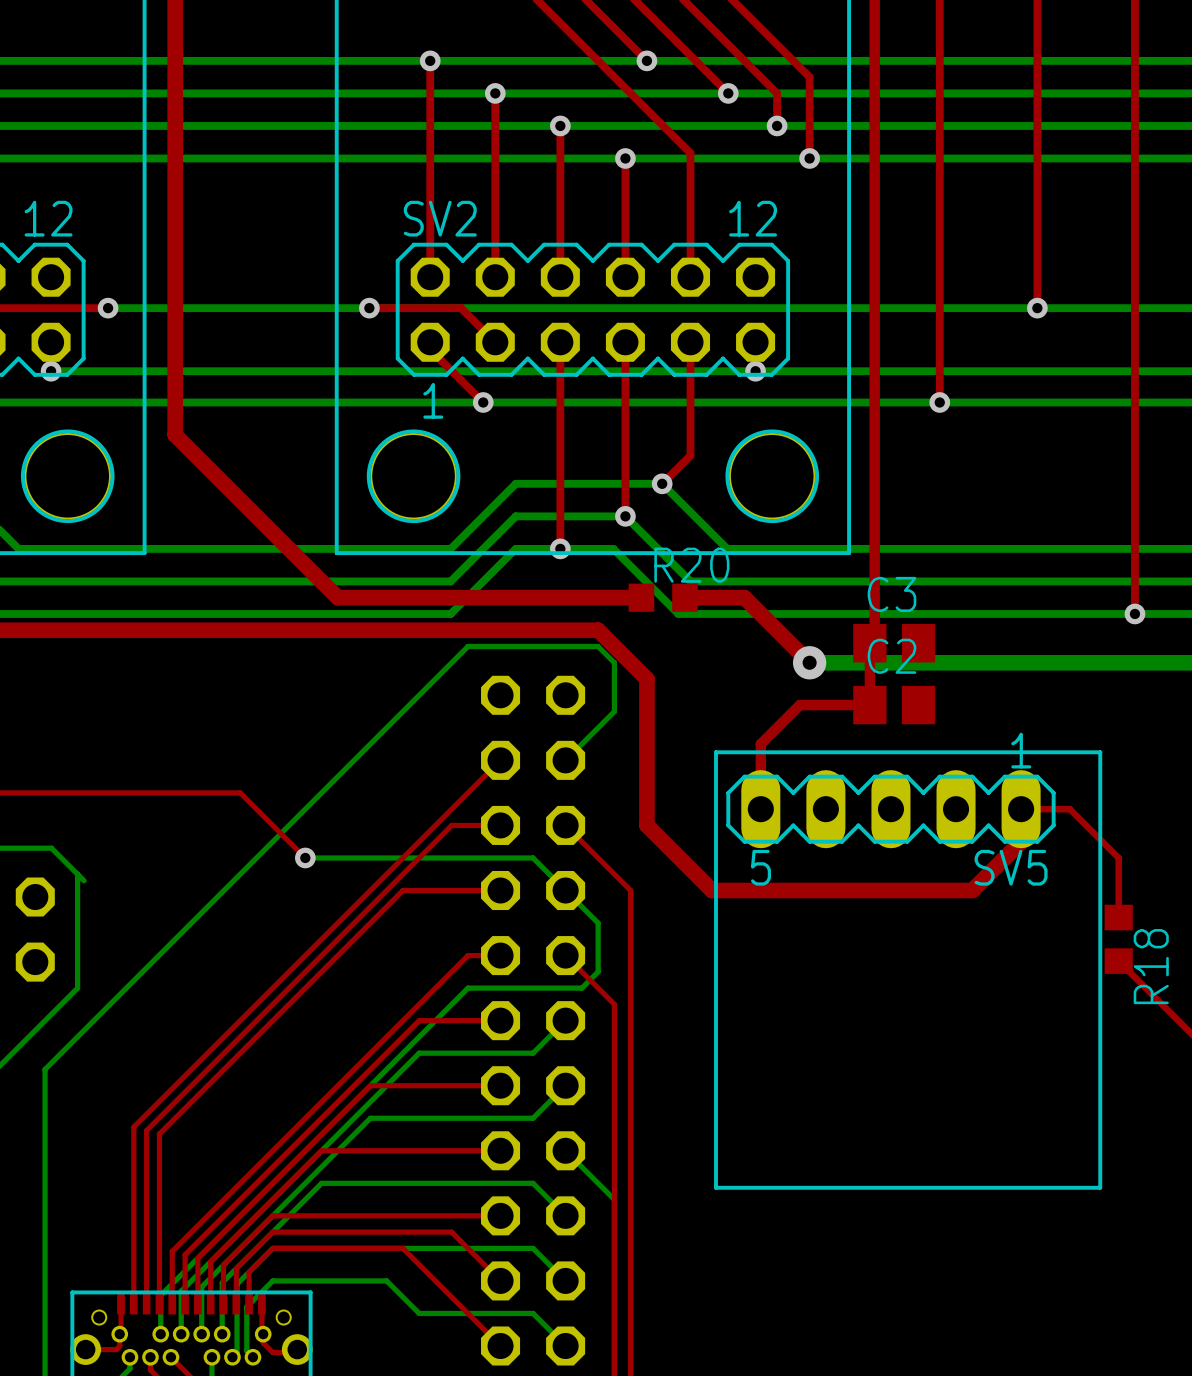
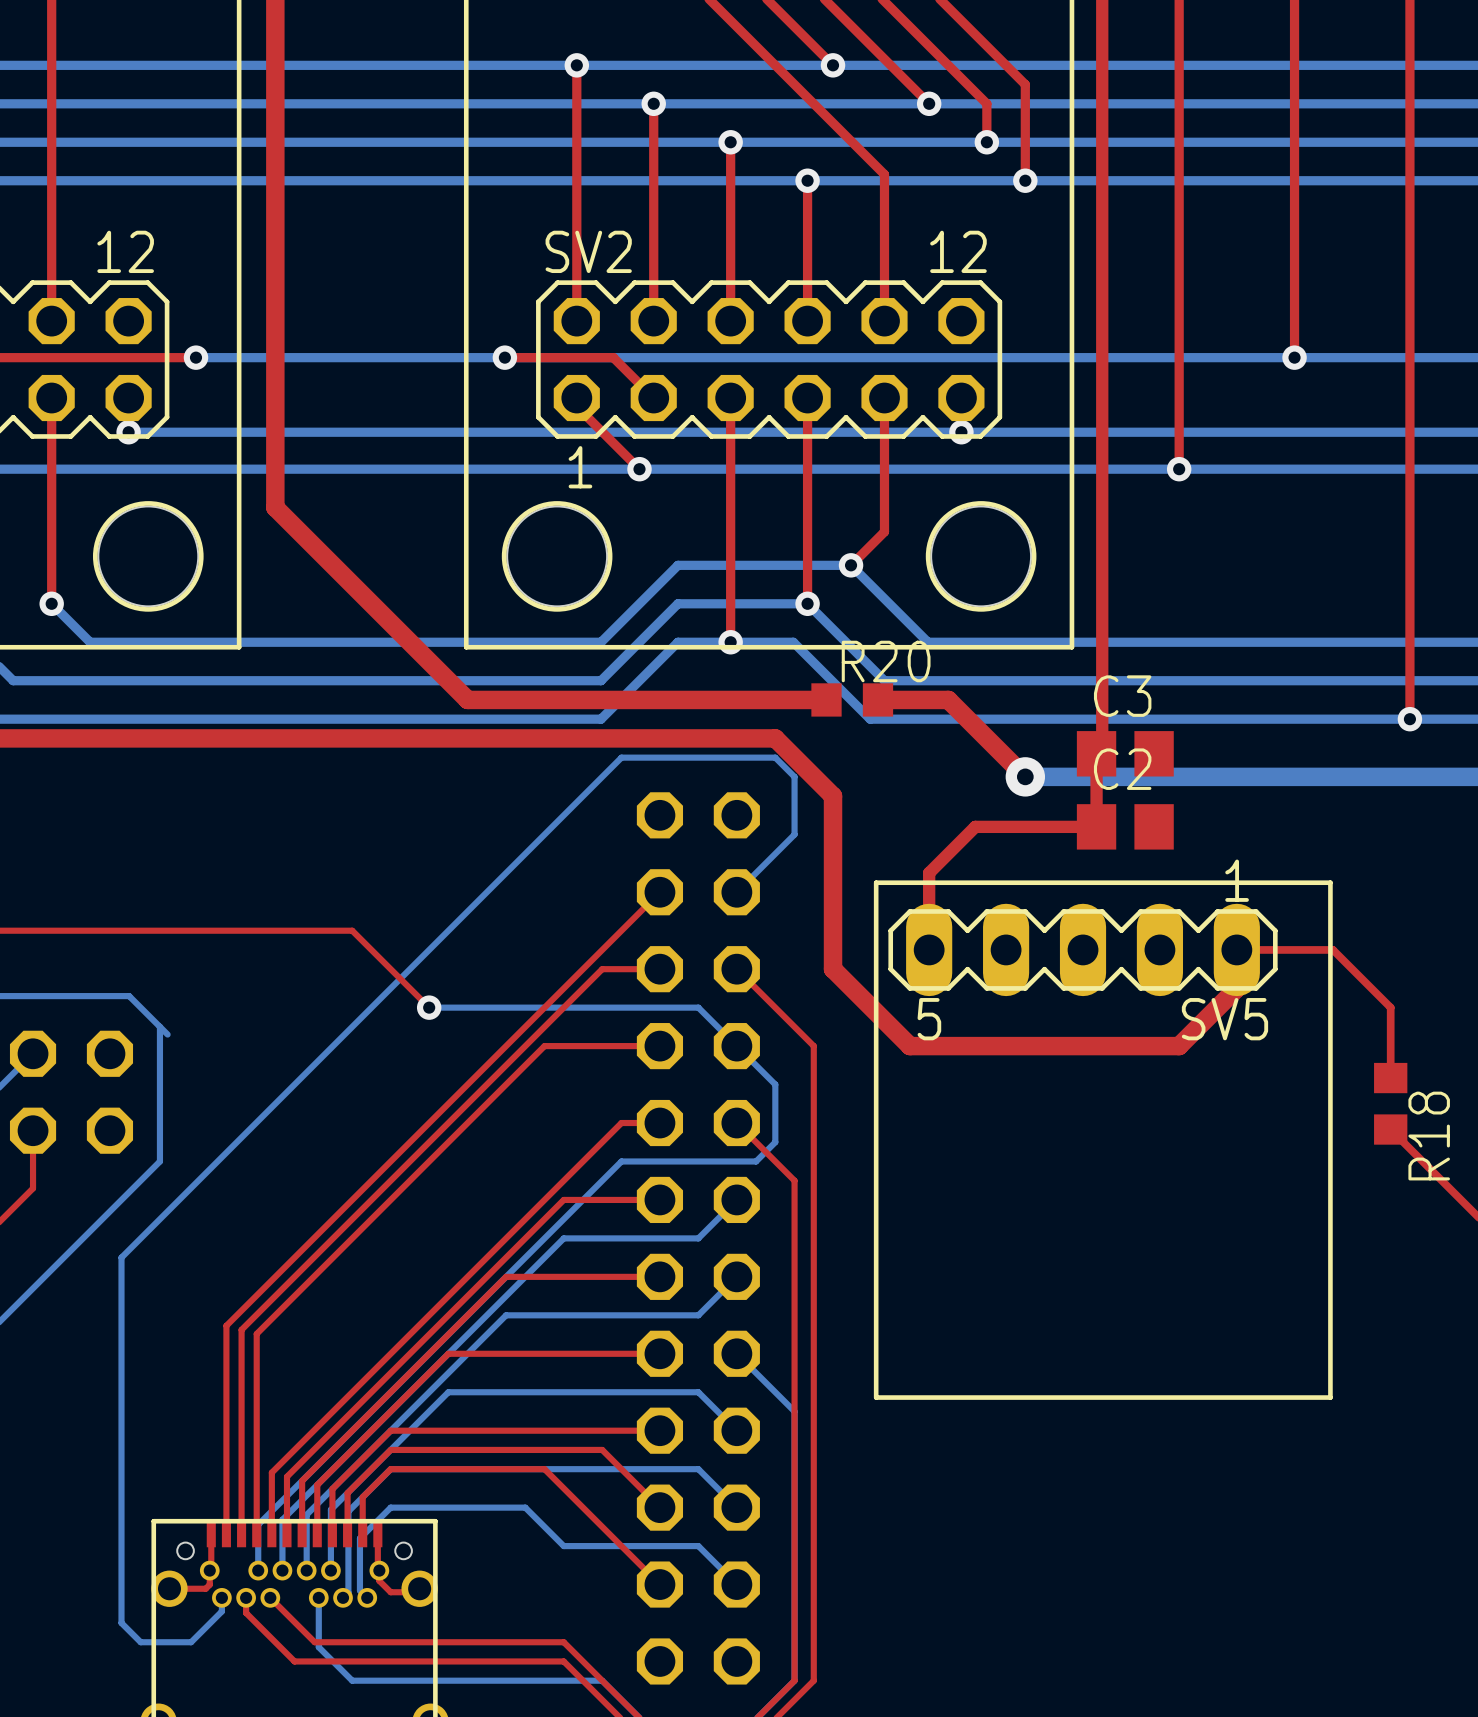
top track: (799, 705) (760, 744) (760, 809) -> (1013, 826) (975, 826) (929, 873) (929, 949)
line: (715, 752) (715, 1187) -> (914, 882) (876, 882) (876, 1397) (914, 1397)
line: (1067, 752) (1100, 752) (1100, 1187) (1067, 1187) -> (1330, 882) (1330, 1397)
SV5 position: (890, 809) -> (1083, 949)
top track: (1021, 809) (1021, 841) (972, 890) (939, 890) -> (1275, 949) (1236, 949) (1236, 988) (1179, 1046)

